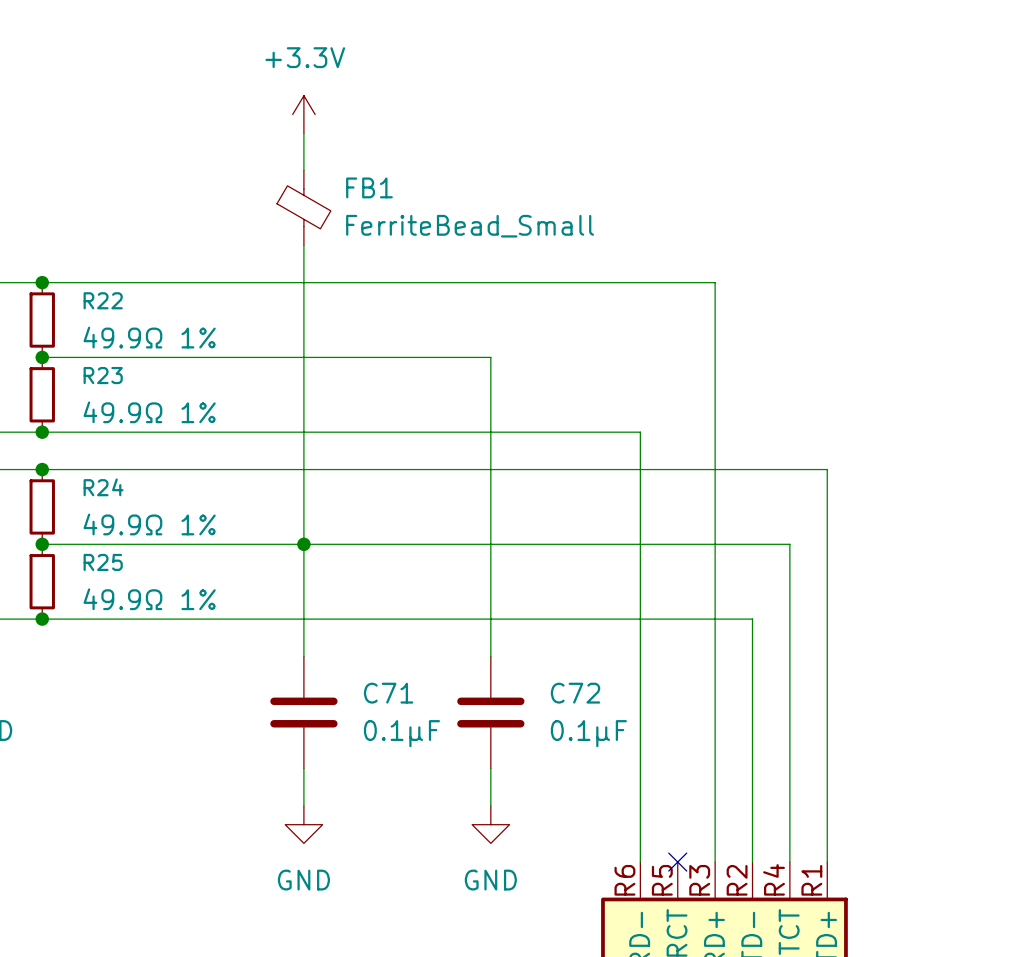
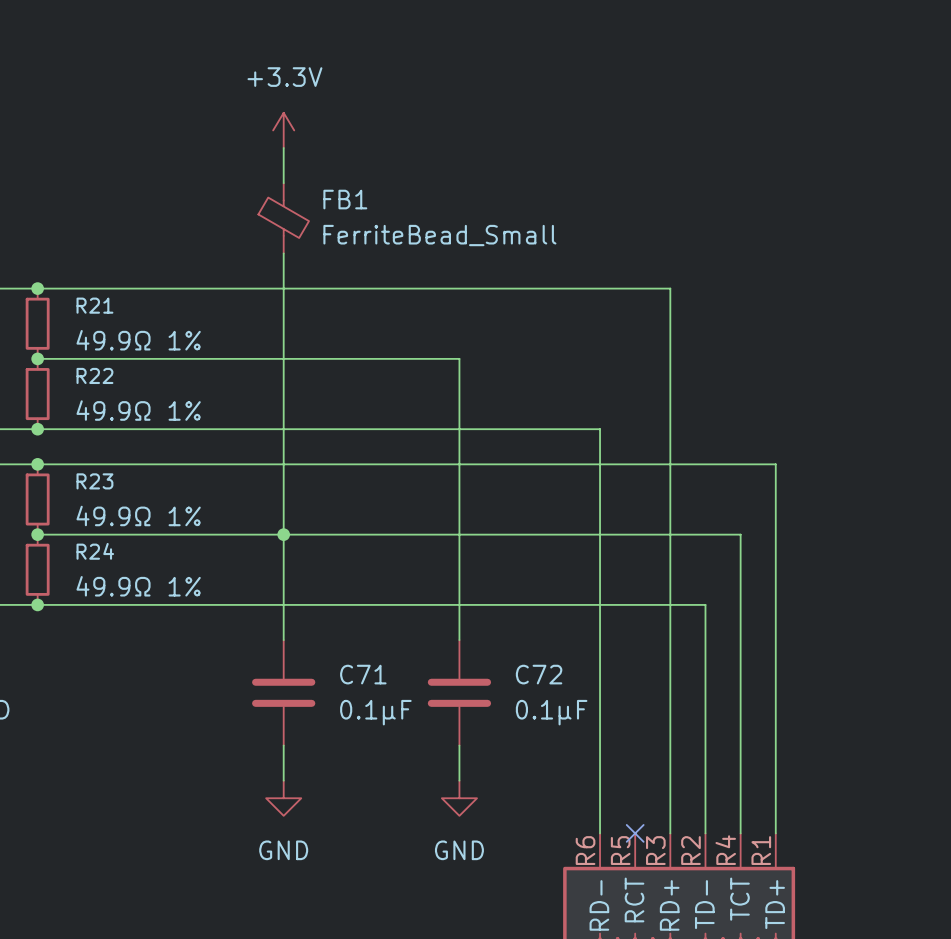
R22 name: R22 (103, 300) -> R21 (94, 305)
R23 name: R23 (103, 375) -> R22 (94, 375)
R24 name: R24 (103, 487) -> R23 (94, 481)
R25 name: R25 (103, 562) -> R24 (95, 551)

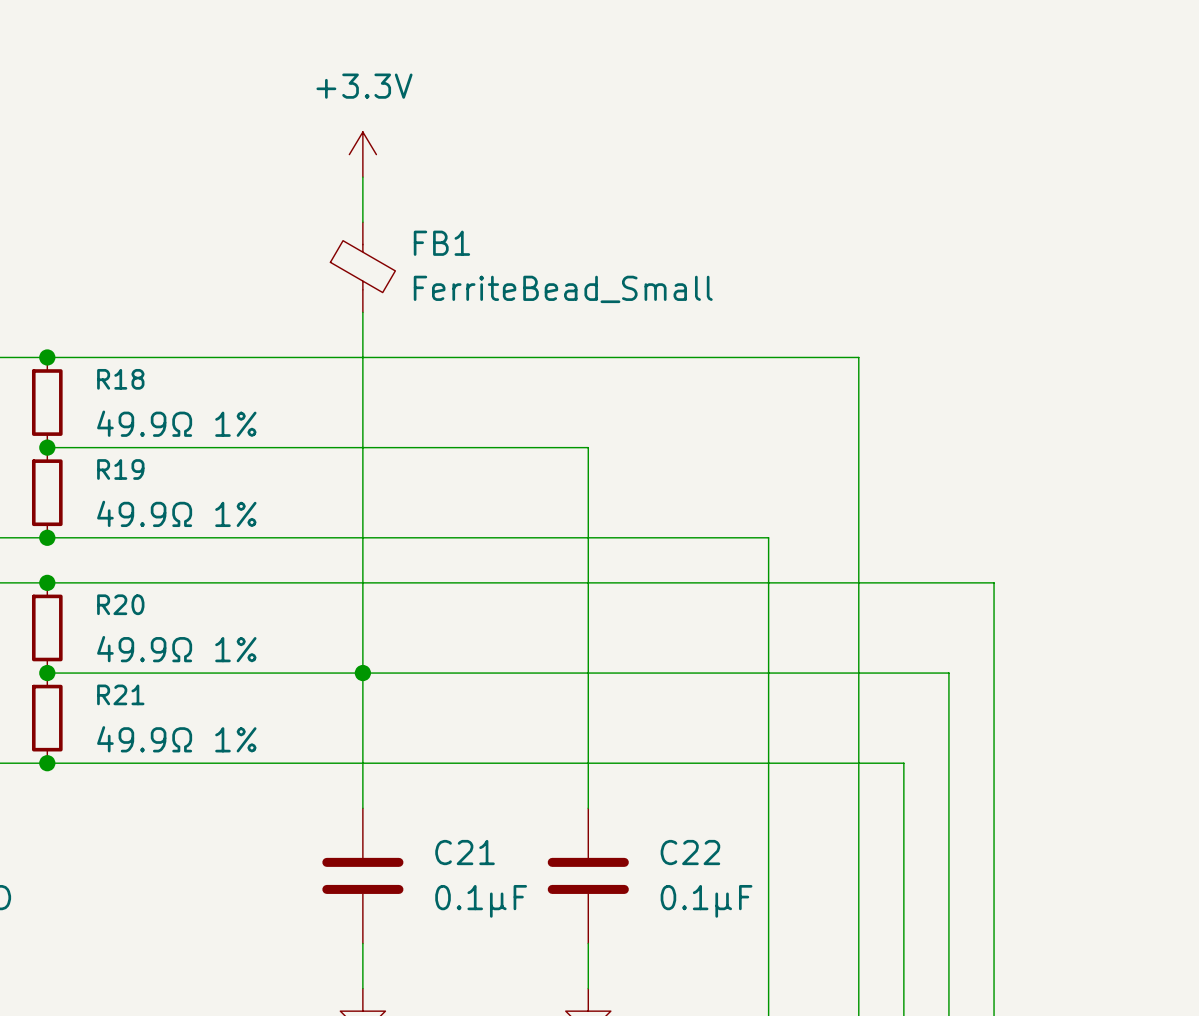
R21 name: R21 (94, 305) -> R18 (120, 379)
R22 name: R22 (94, 375) -> R19 (120, 469)
R23 name: R23 (94, 481) -> R20 (120, 604)
R24 name: R24 (95, 551) -> R21 (120, 694)
C71 name: C71 (363, 674) -> C21 (465, 852)
C72 name: C72 (539, 674) -> C22 (690, 852)

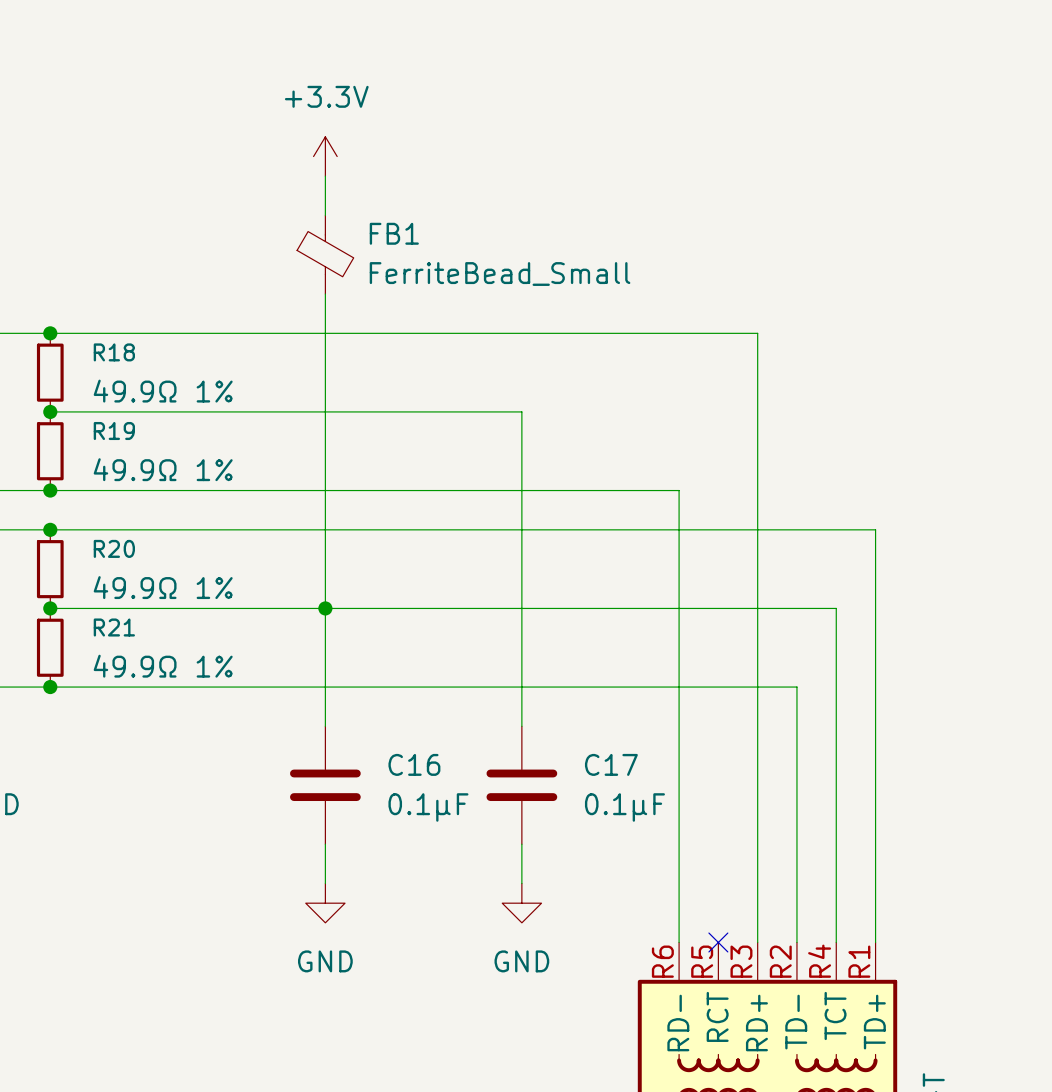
C21 name: C21 (465, 852) -> C16 (414, 764)
C22 name: C22 (690, 852) -> C17 (611, 764)

